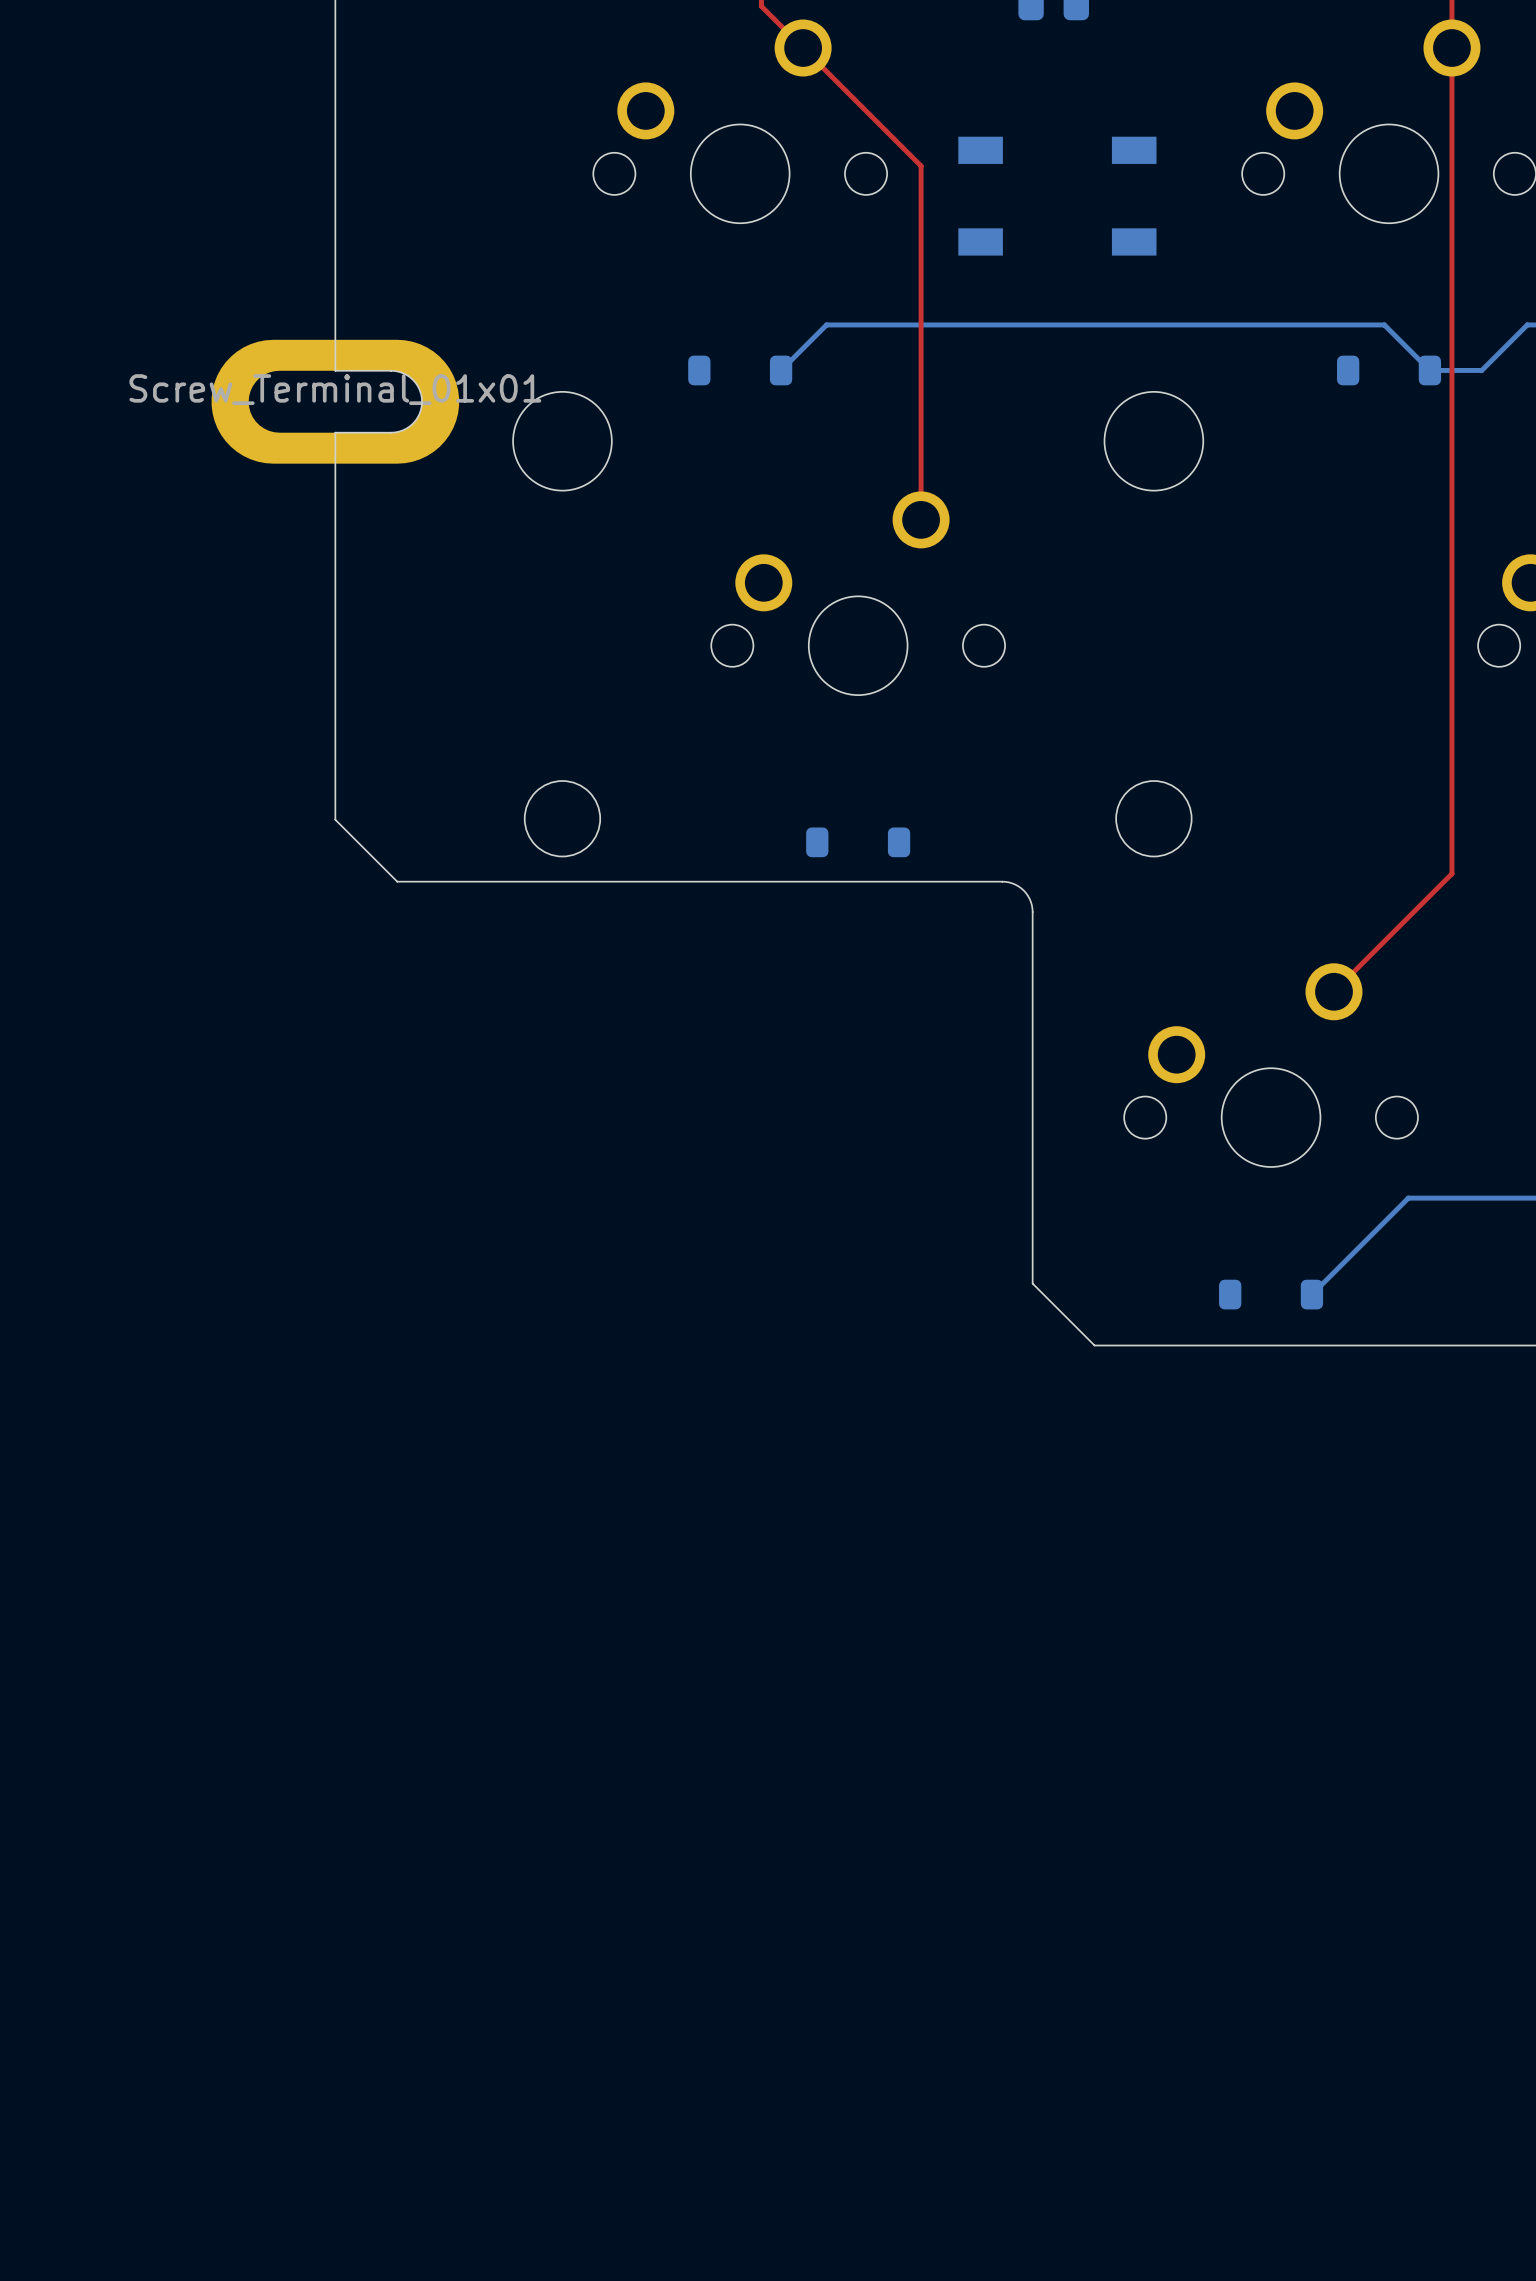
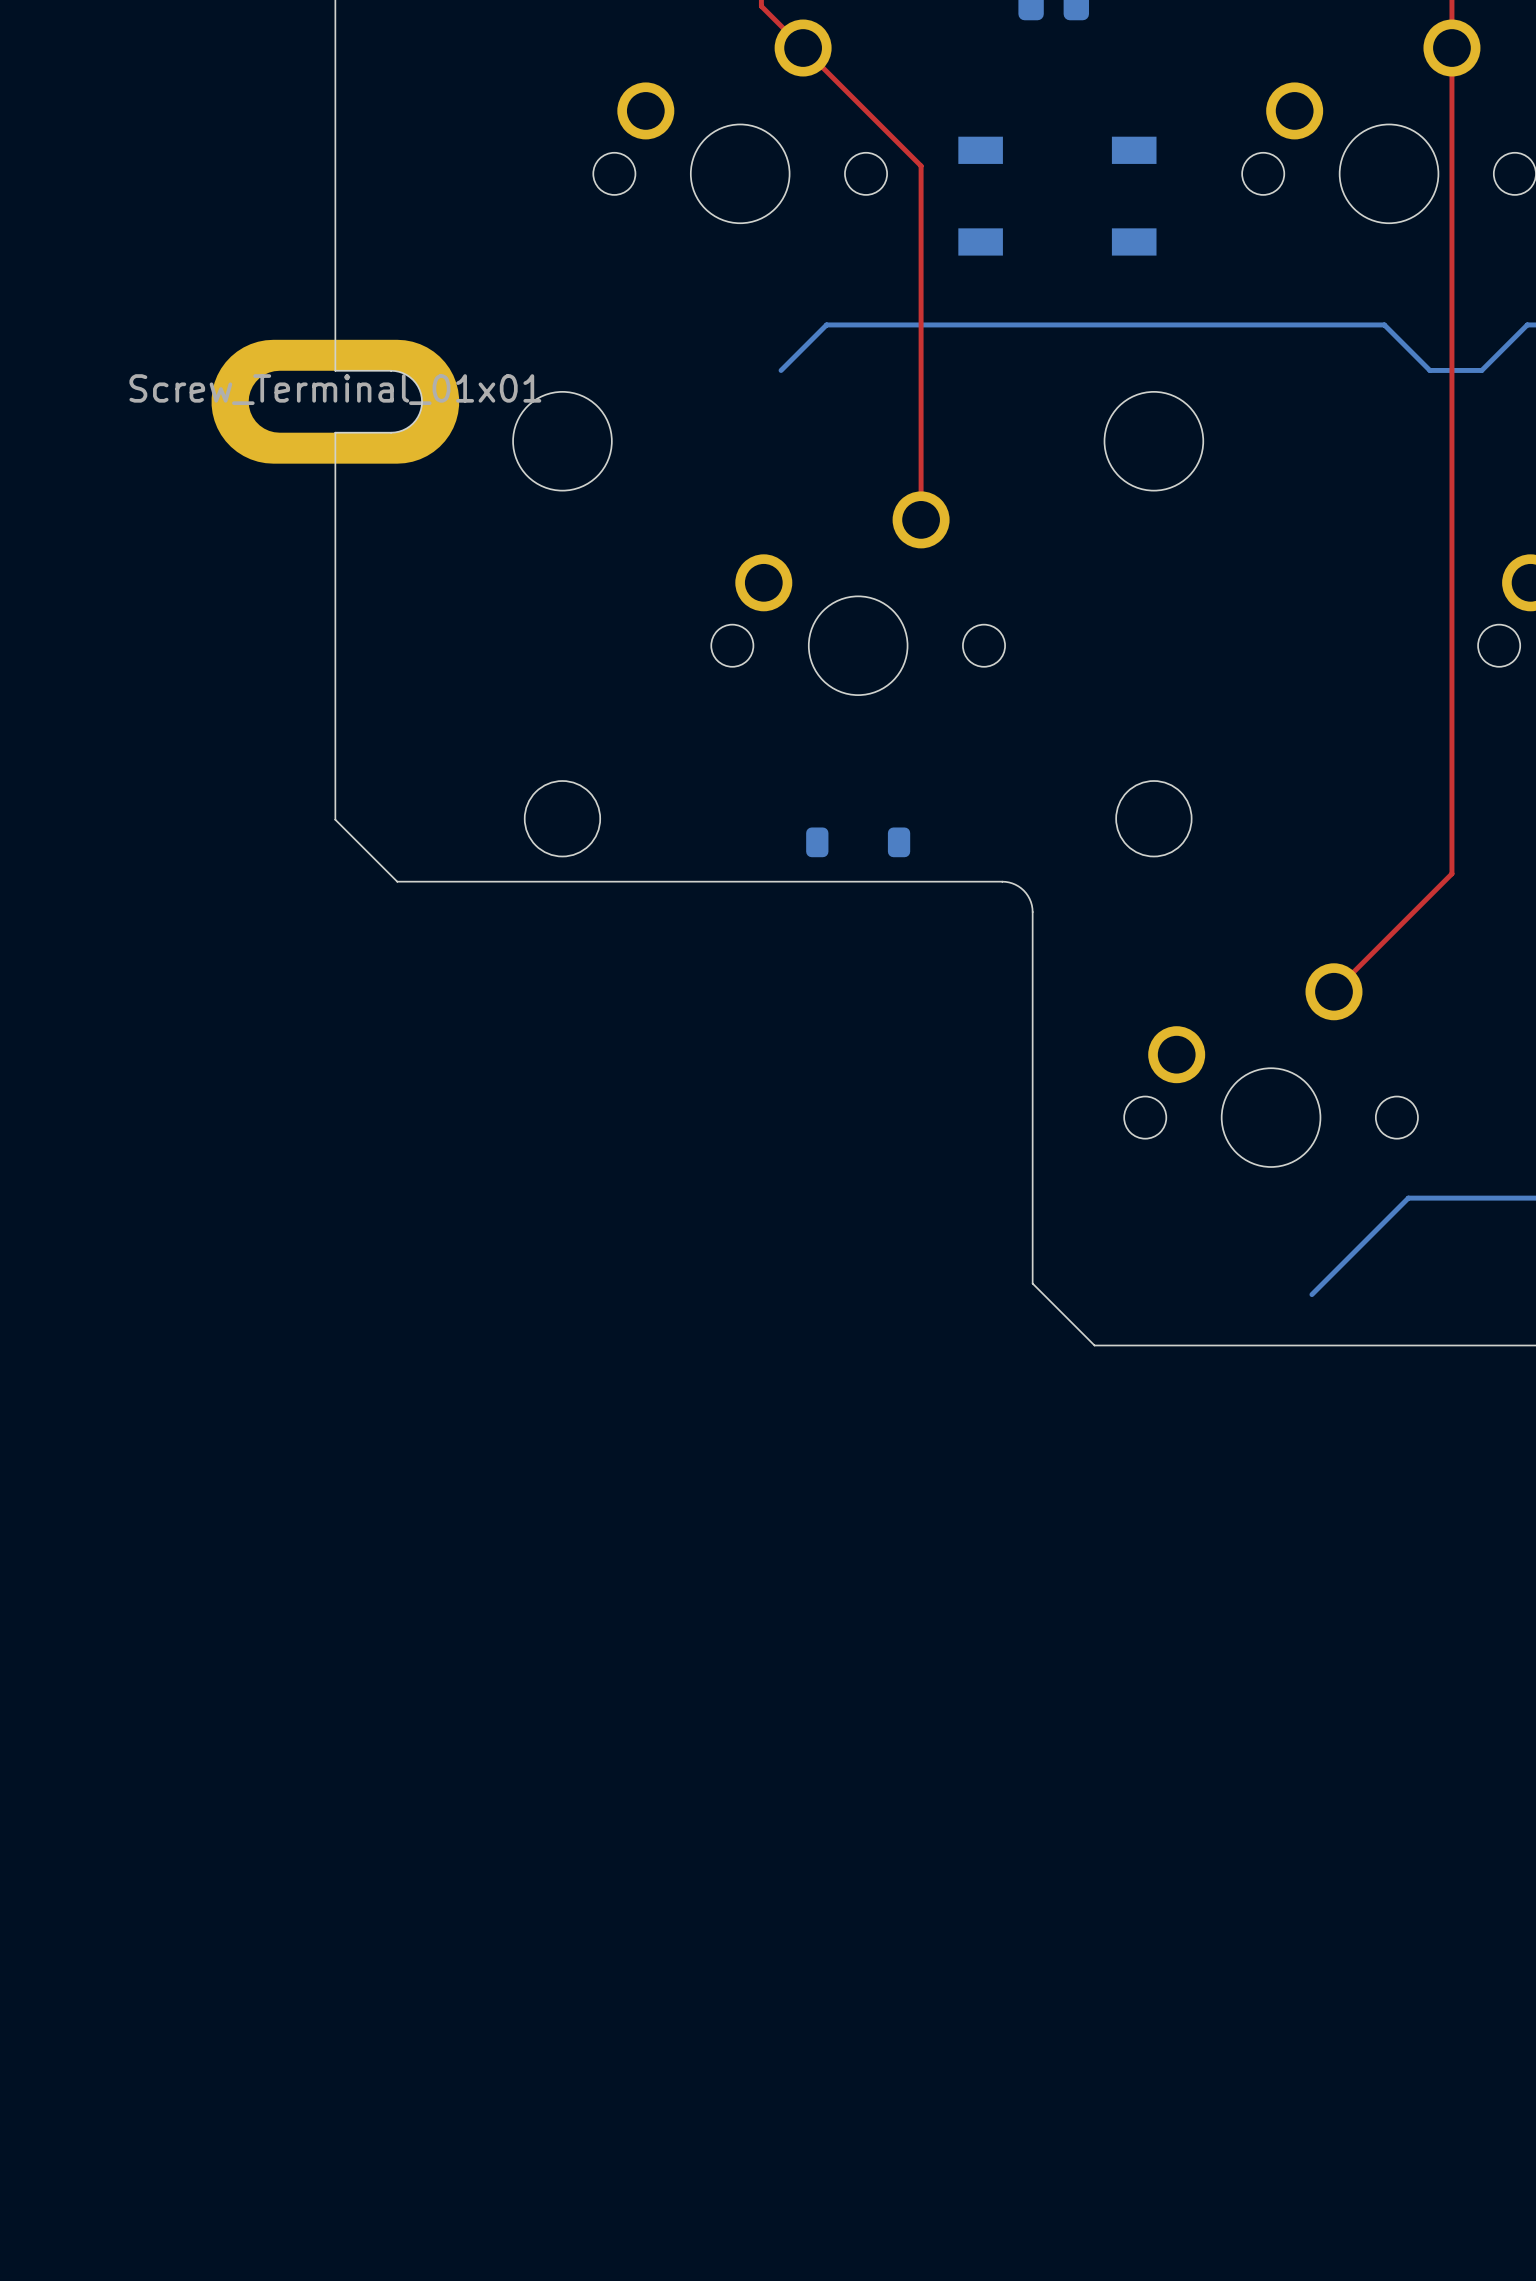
part: (740, 370) -> none
part: (1389, 370) -> none
part: (1271, 1294) -> none

